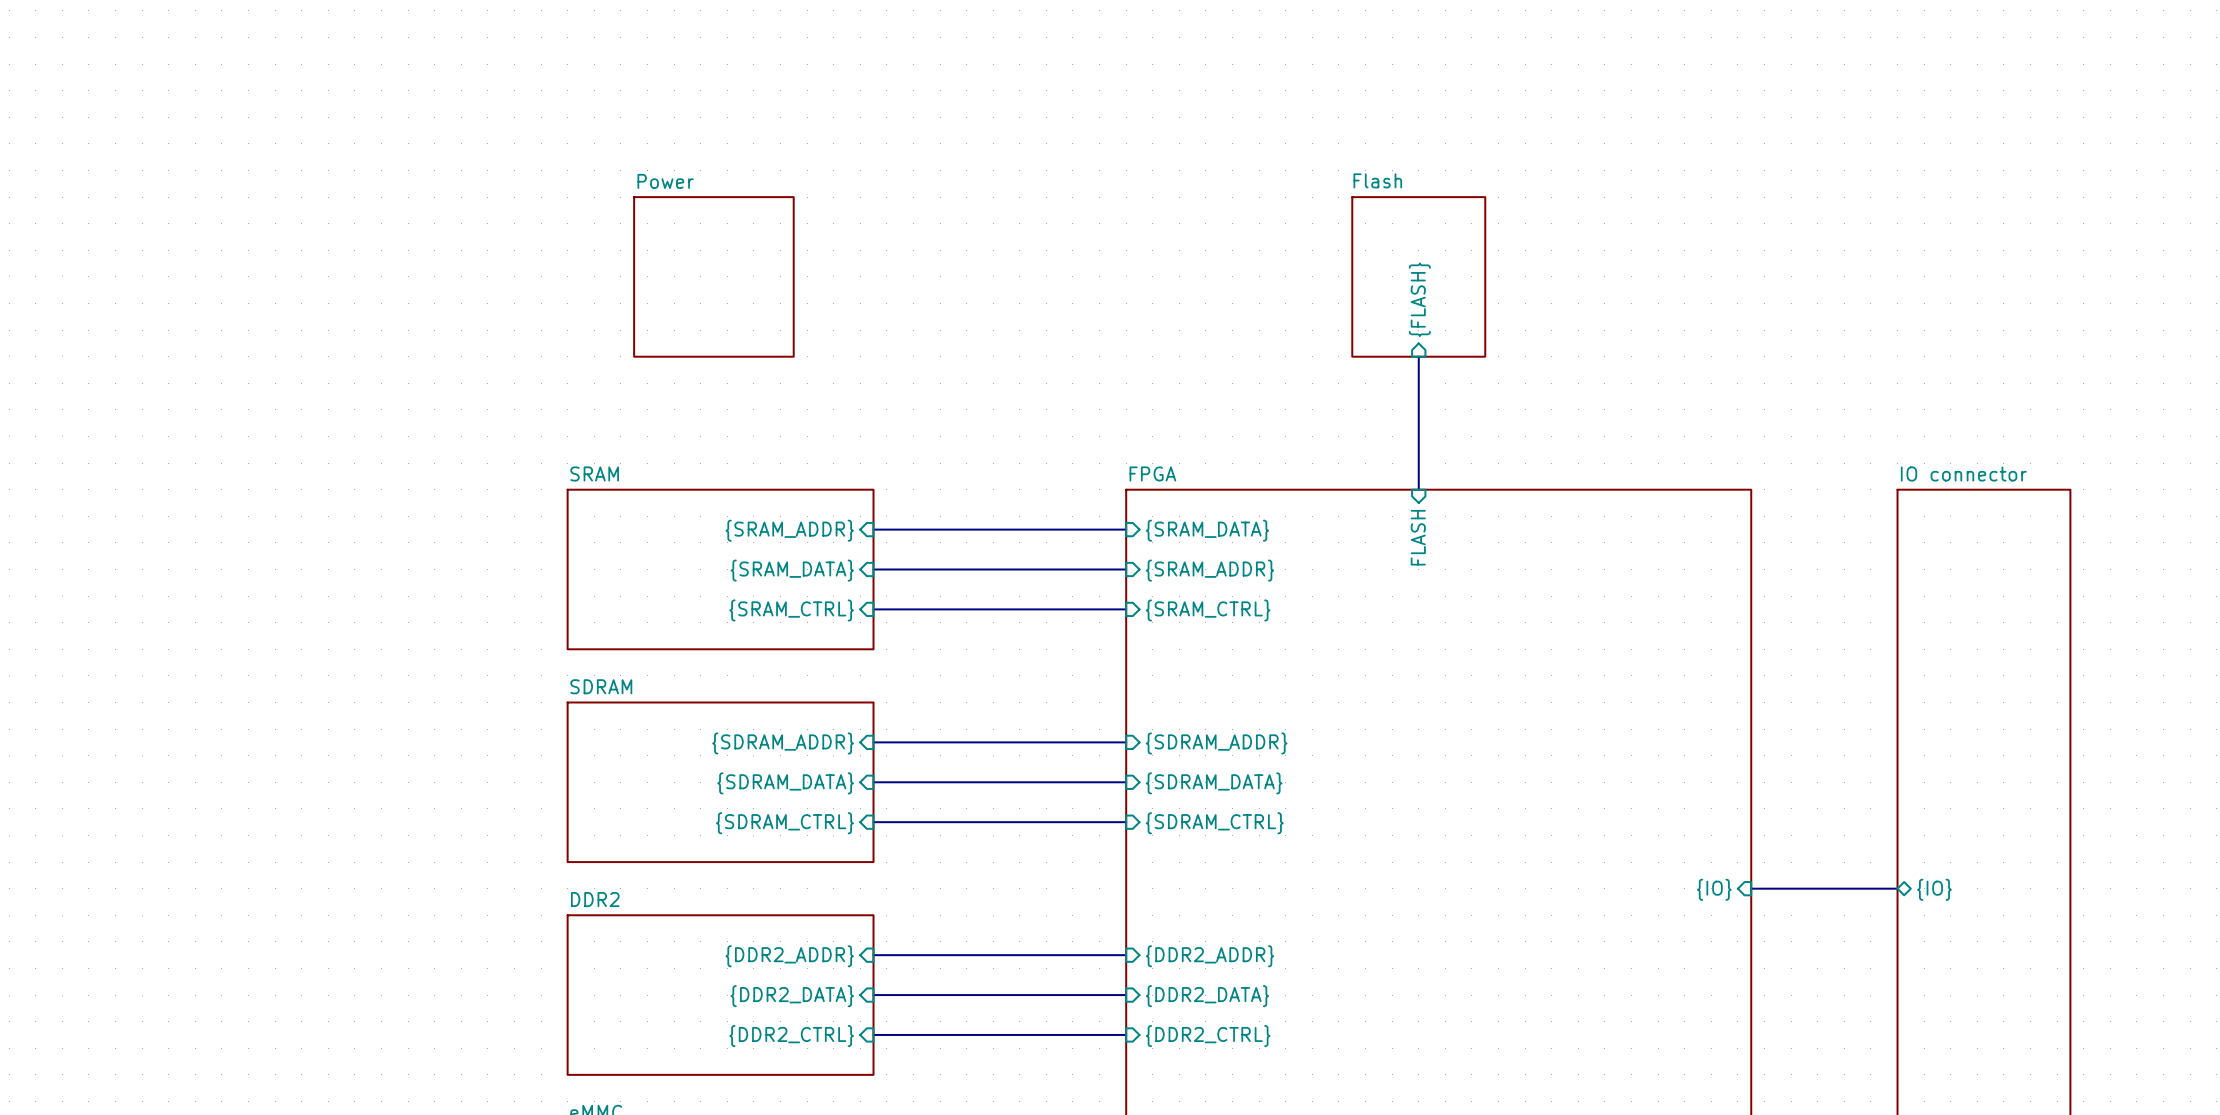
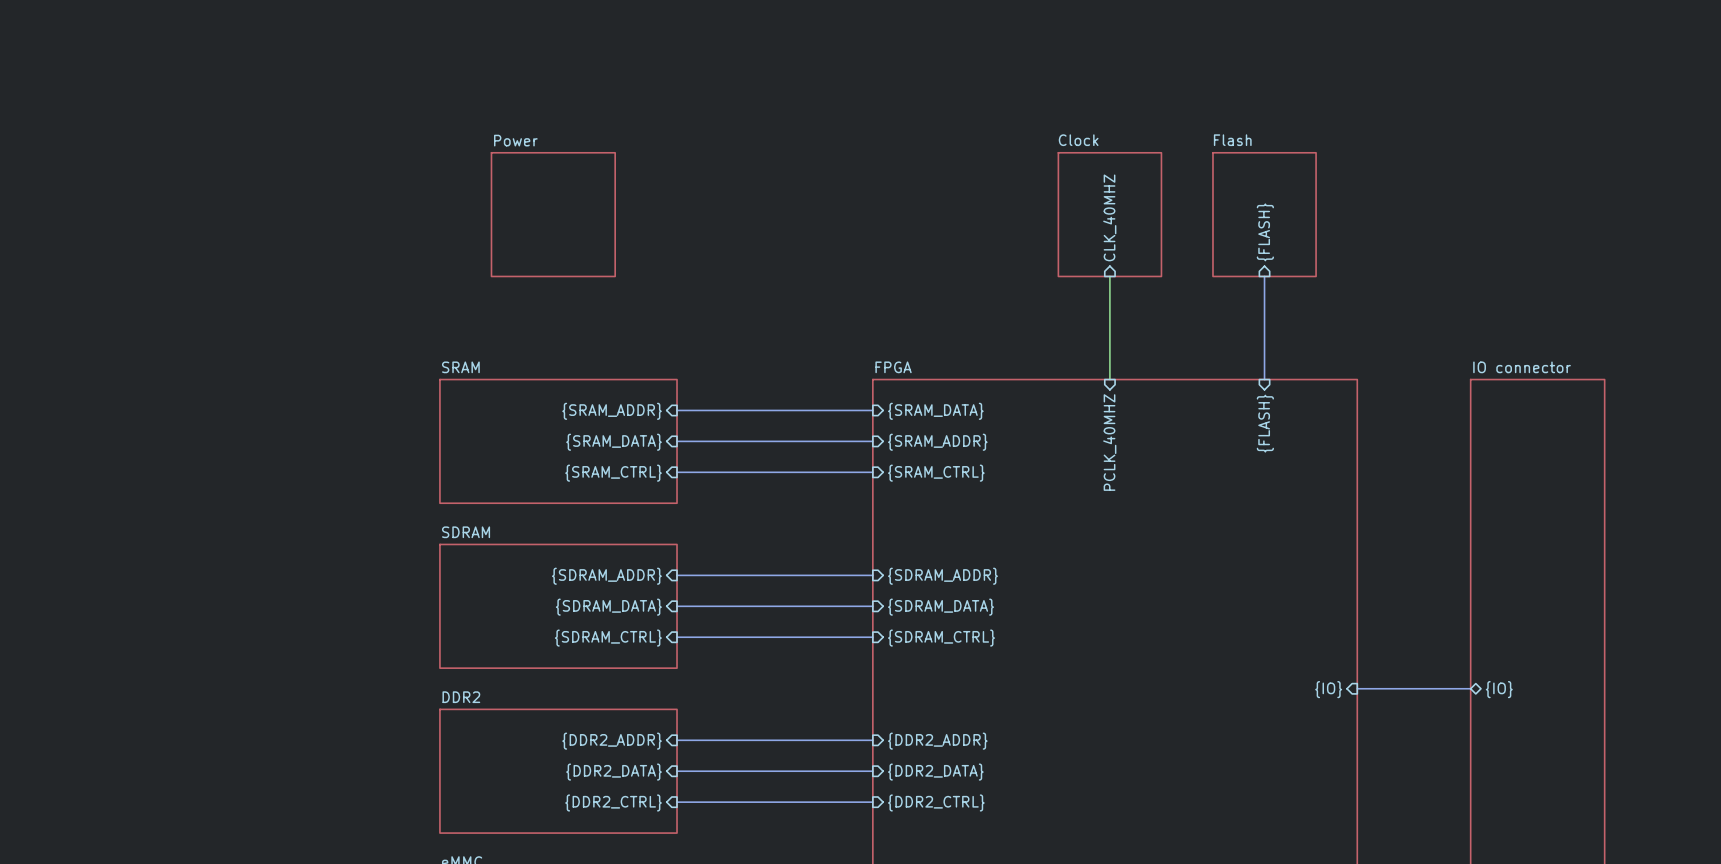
sheet Flash position: (1418, 276) -> (1264, 214)
sheet Clock: none -> (1109, 214)
sheet pin: none -> CLK_40MHZ (1109, 217)
sheet pin: {FLASH} (1419, 299) -> none
sheet pin: none -> {FLASH} (1265, 232)
bus: (1418, 356) (1418, 489) -> (1264, 276) (1264, 379)
wire: none -> (1109, 276) (1109, 379)
sheet pin: FLASH (1418, 537) -> none
sheet pin: none -> {FLASH} (1265, 423)
sheet pin: none -> PCLK_40MHZ (1109, 442)

